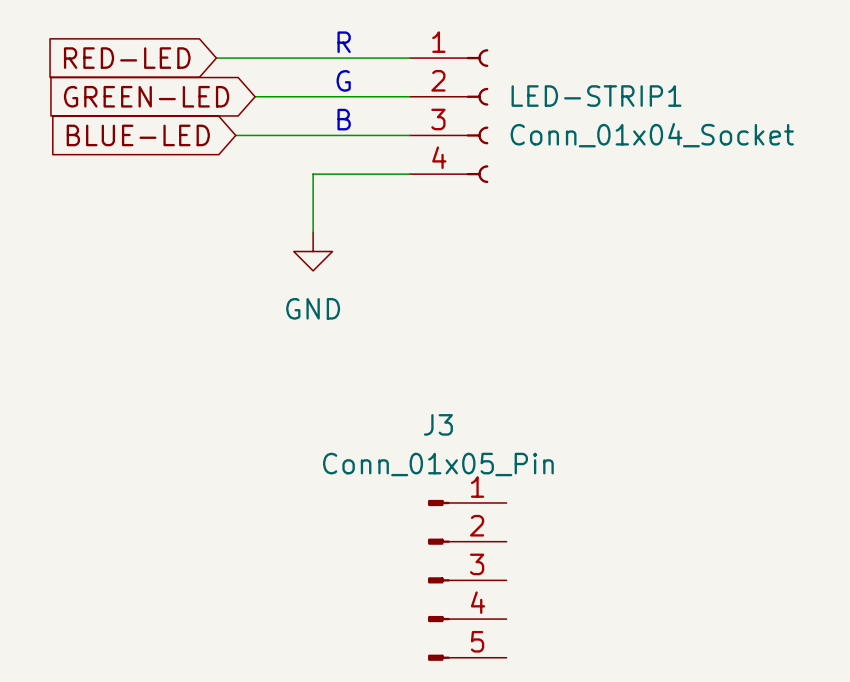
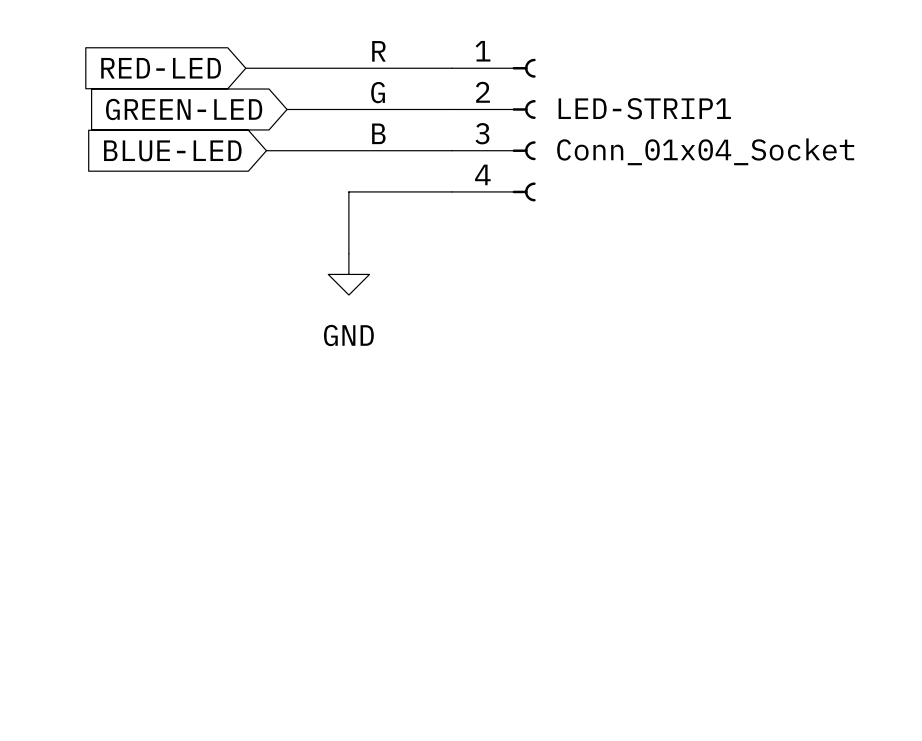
J3: Conn_01x05_Pin (467, 580) -> none

